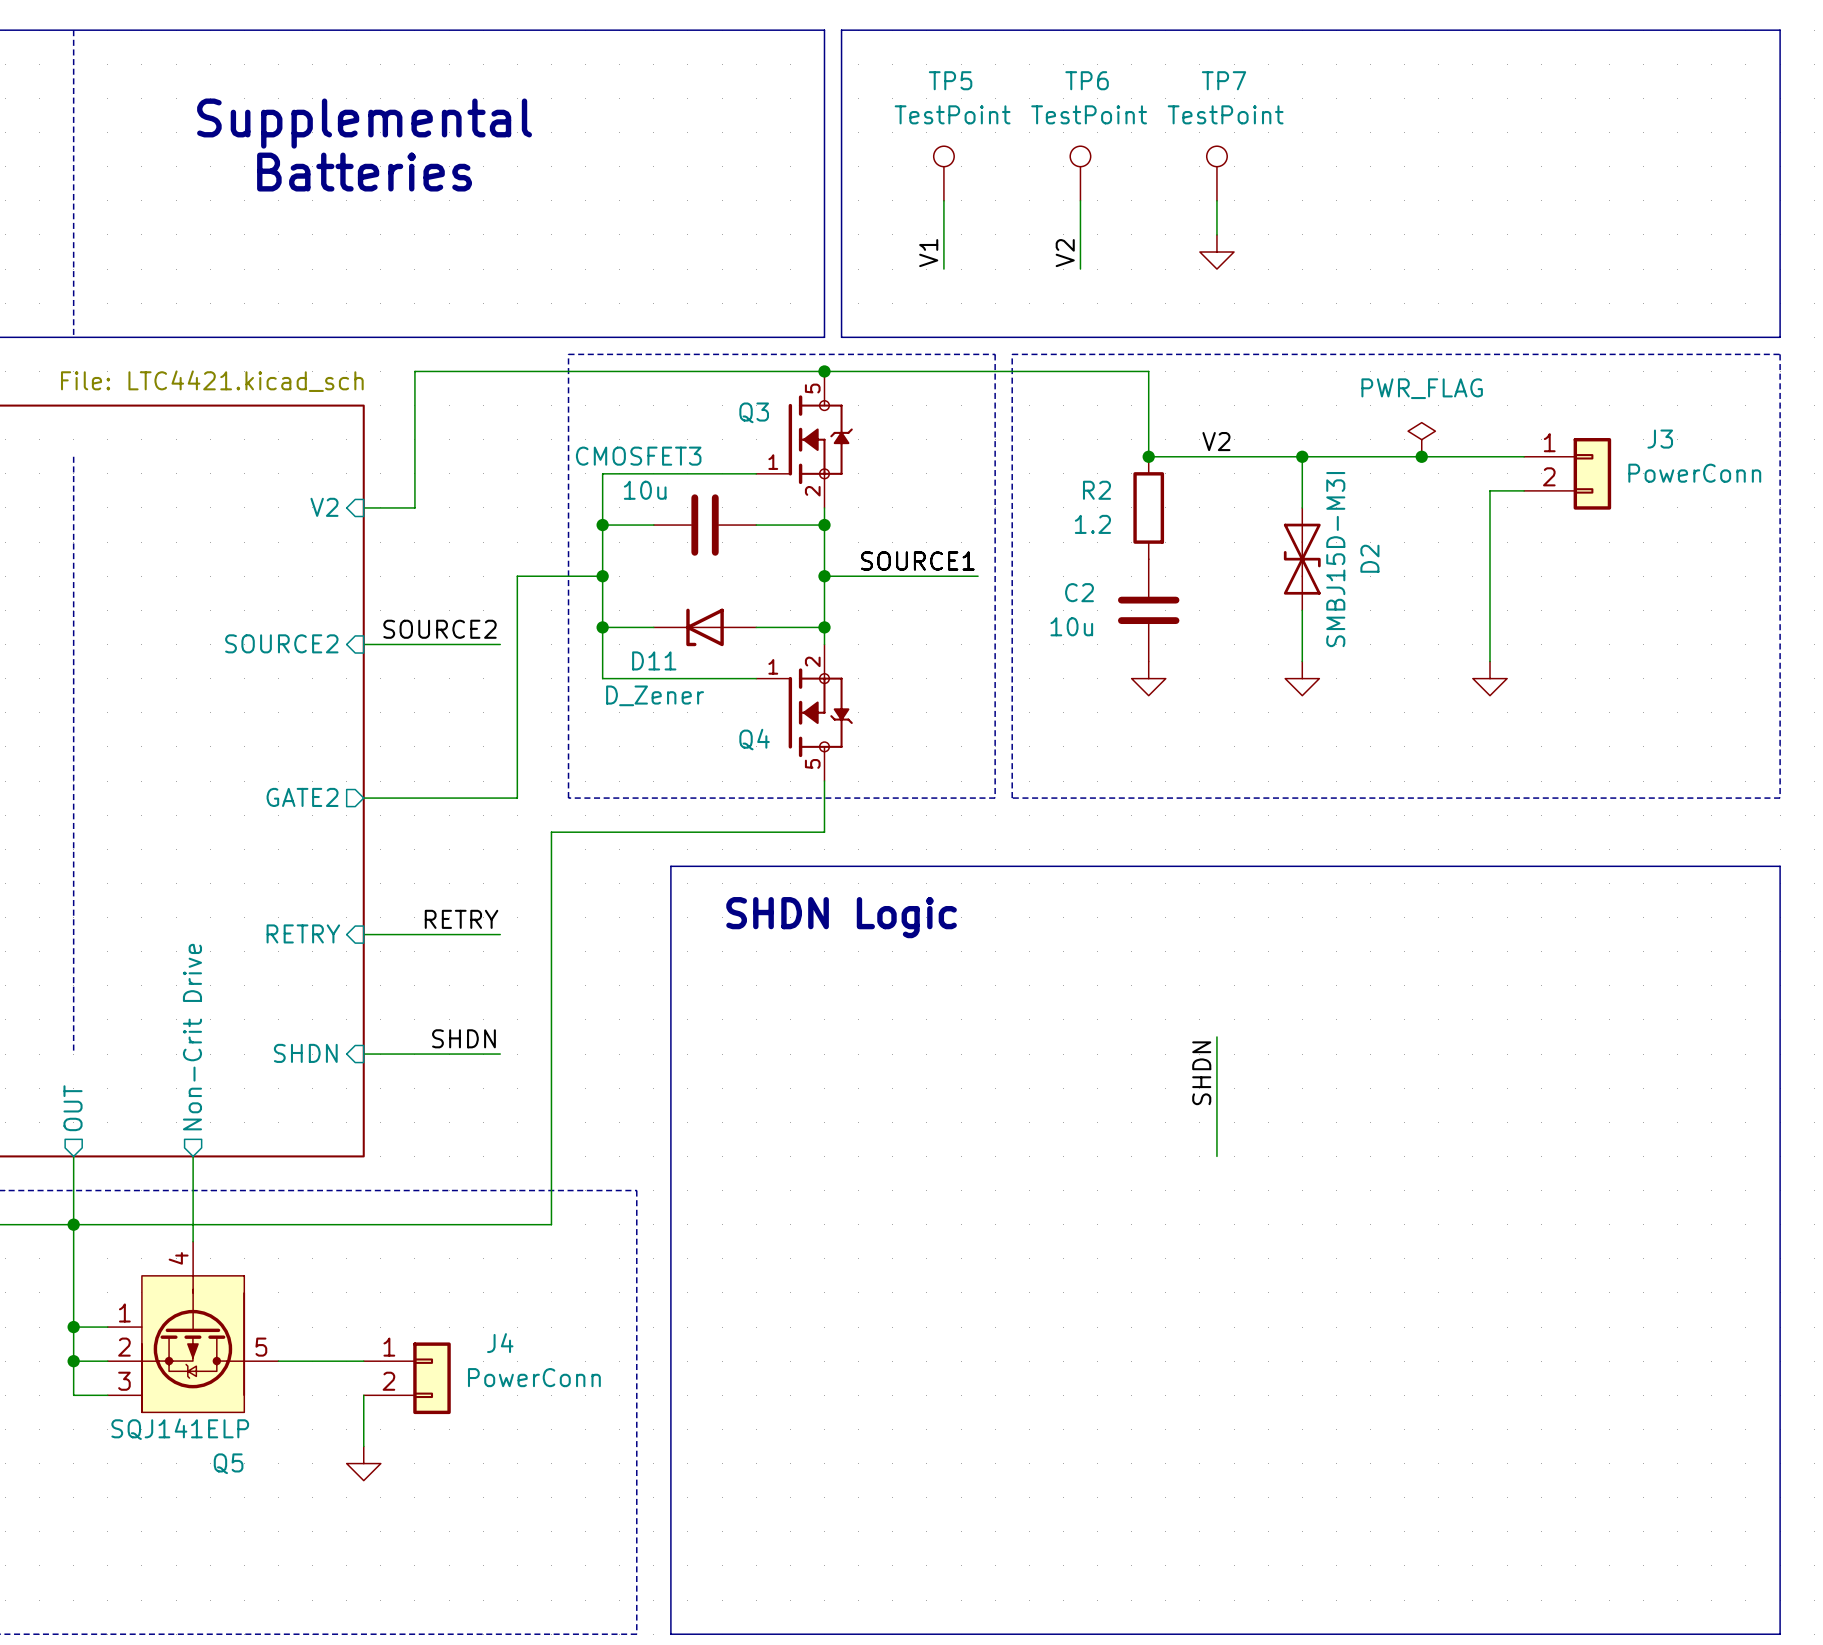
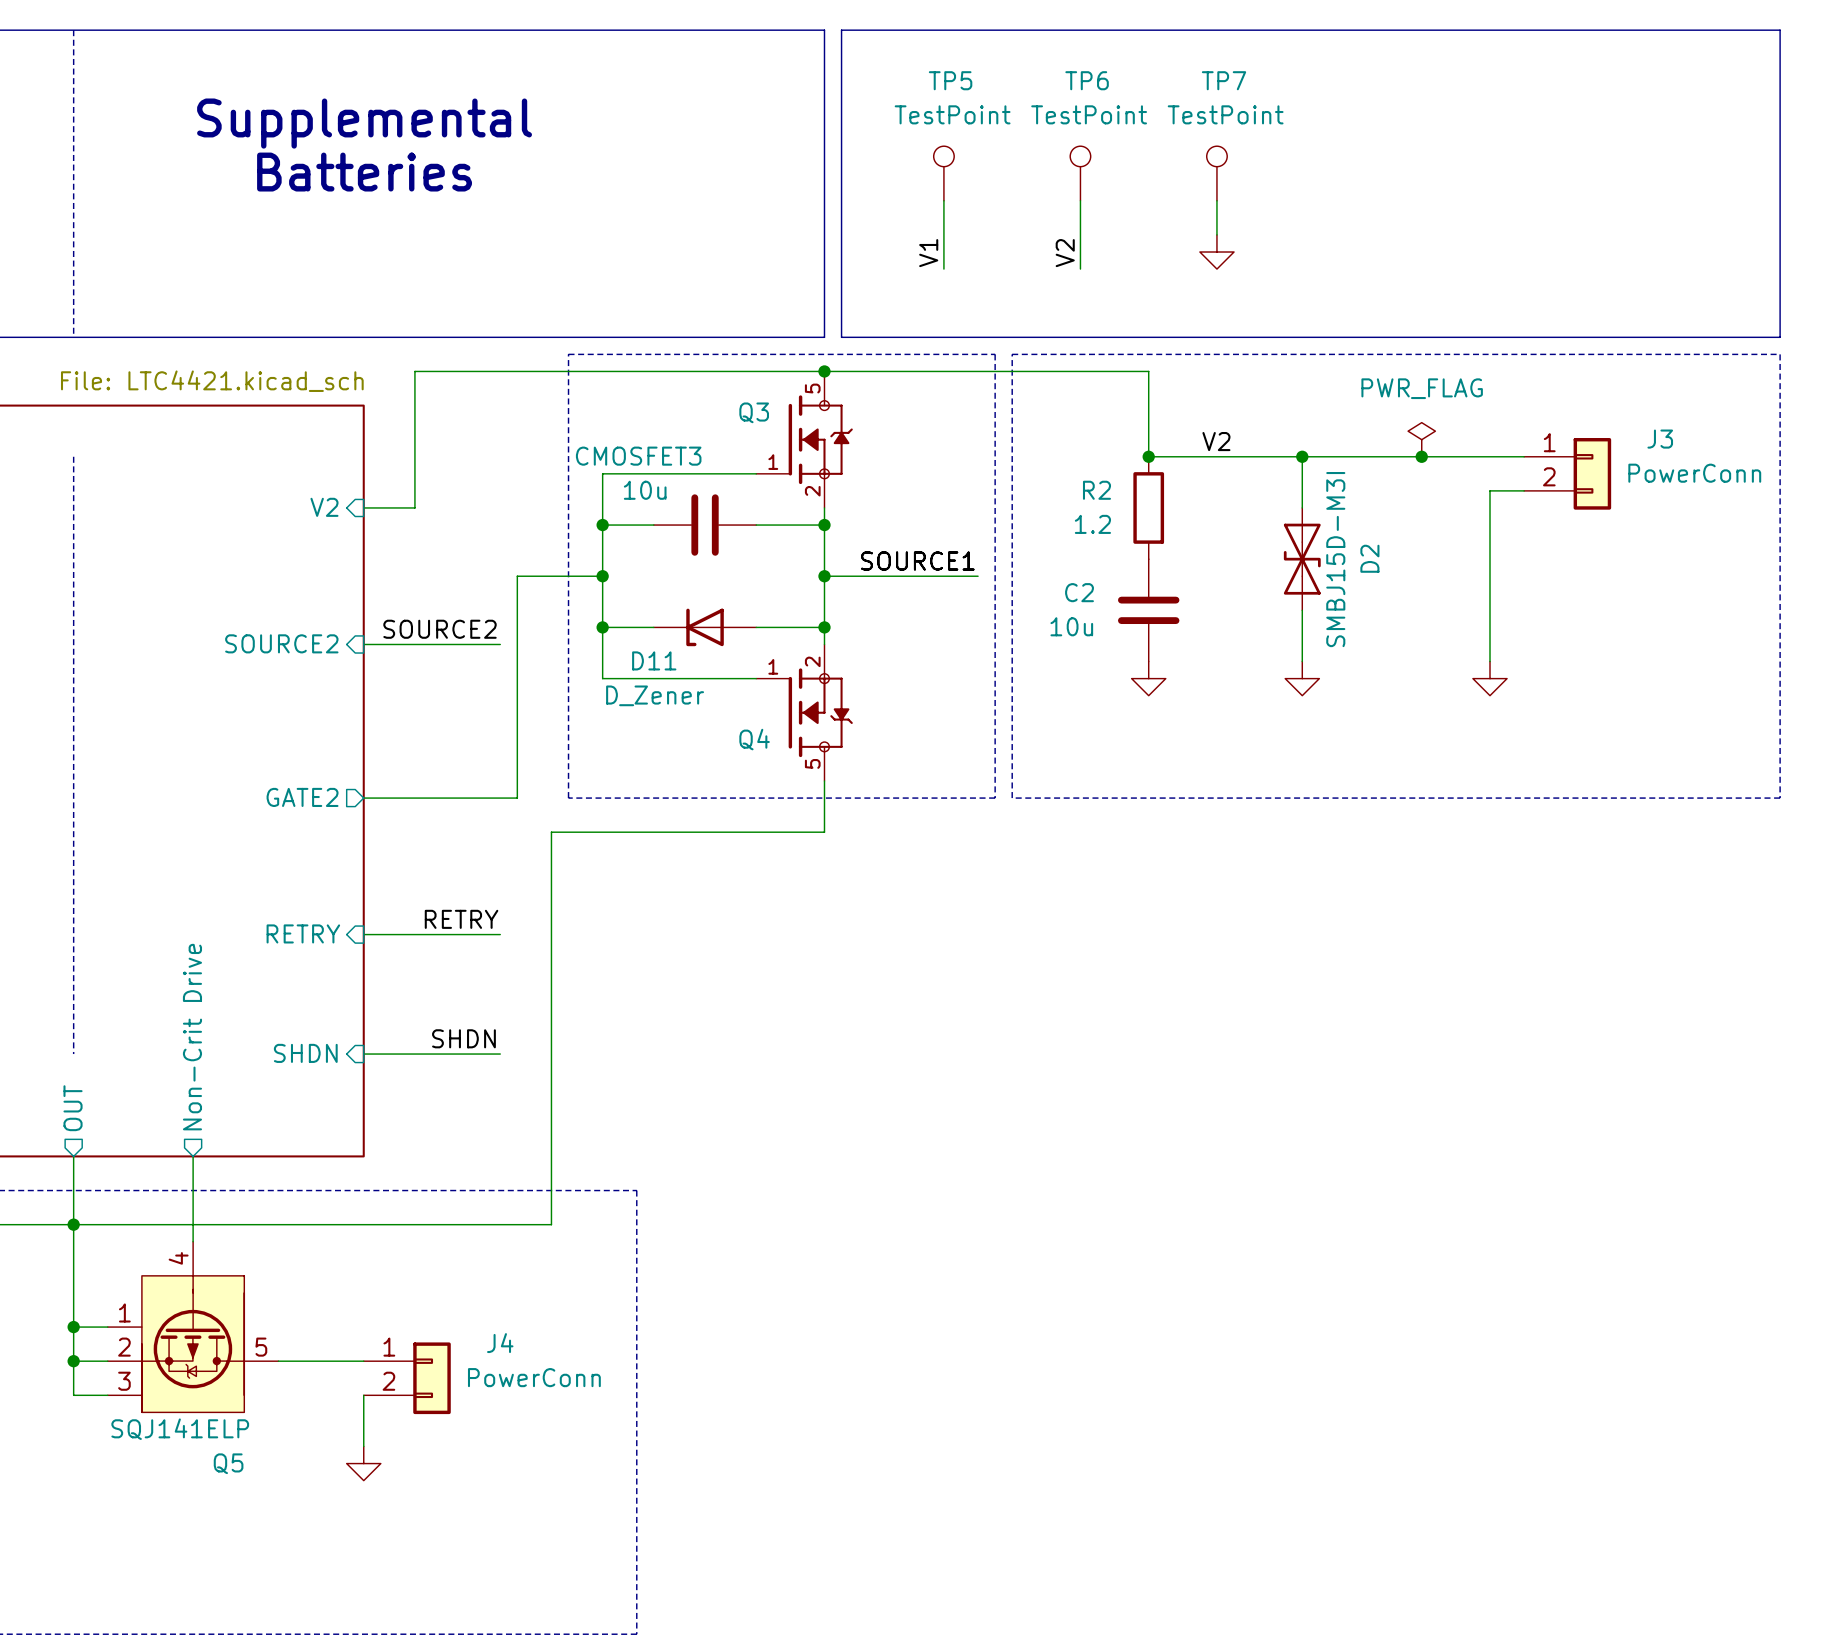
line: (670, 866) (1780, 866) (1780, 1634) (670, 1634) (670, 866) -> none
text: SHDN Logic (841, 917) -> none
wire: (1216, 1036) (1216, 1156) -> none
label: SHDN (1201, 1073) -> none

